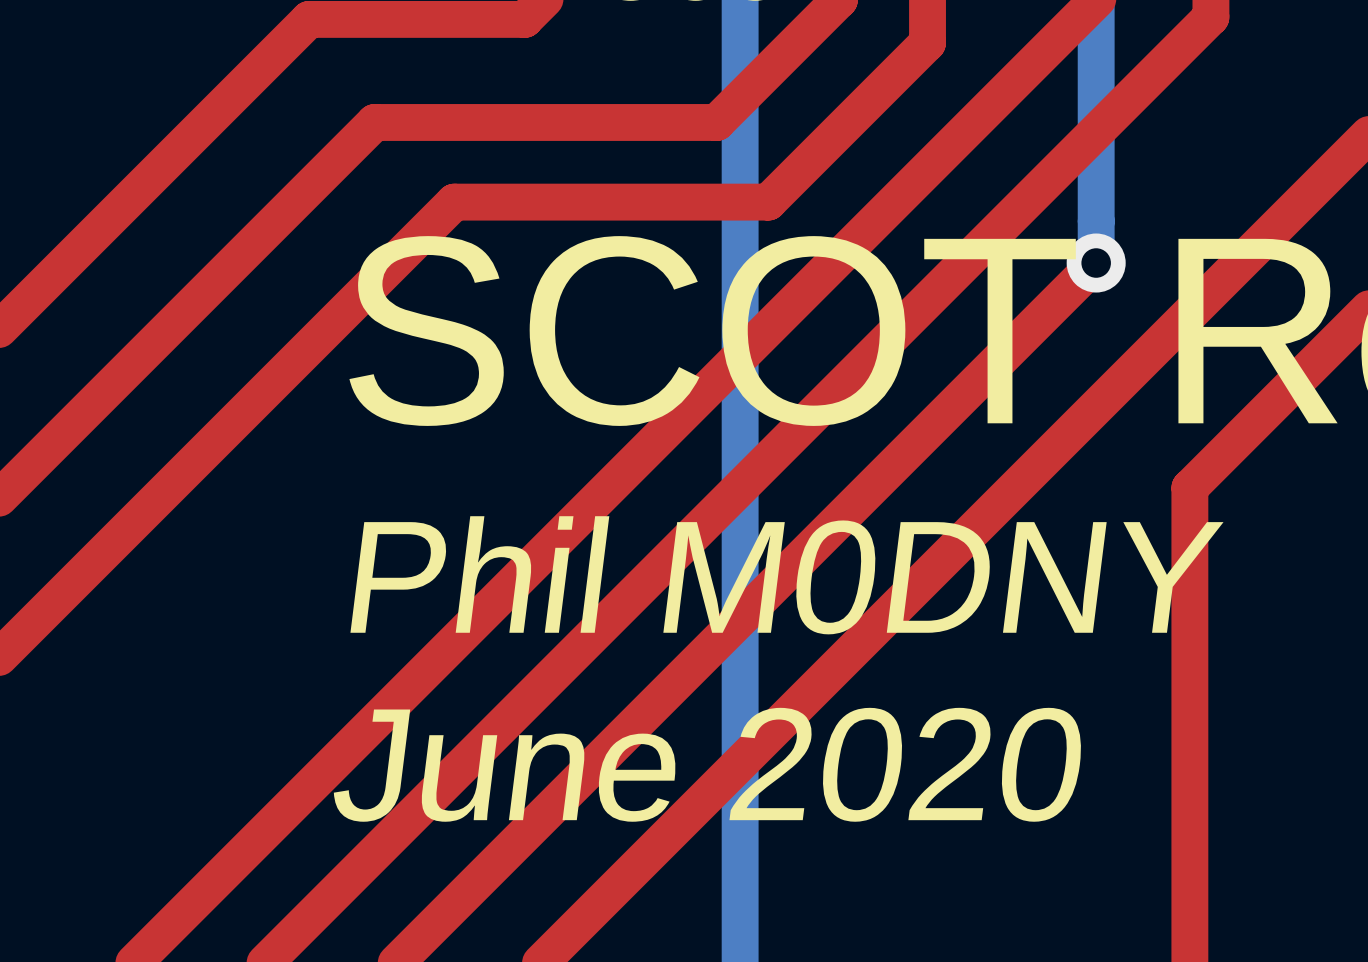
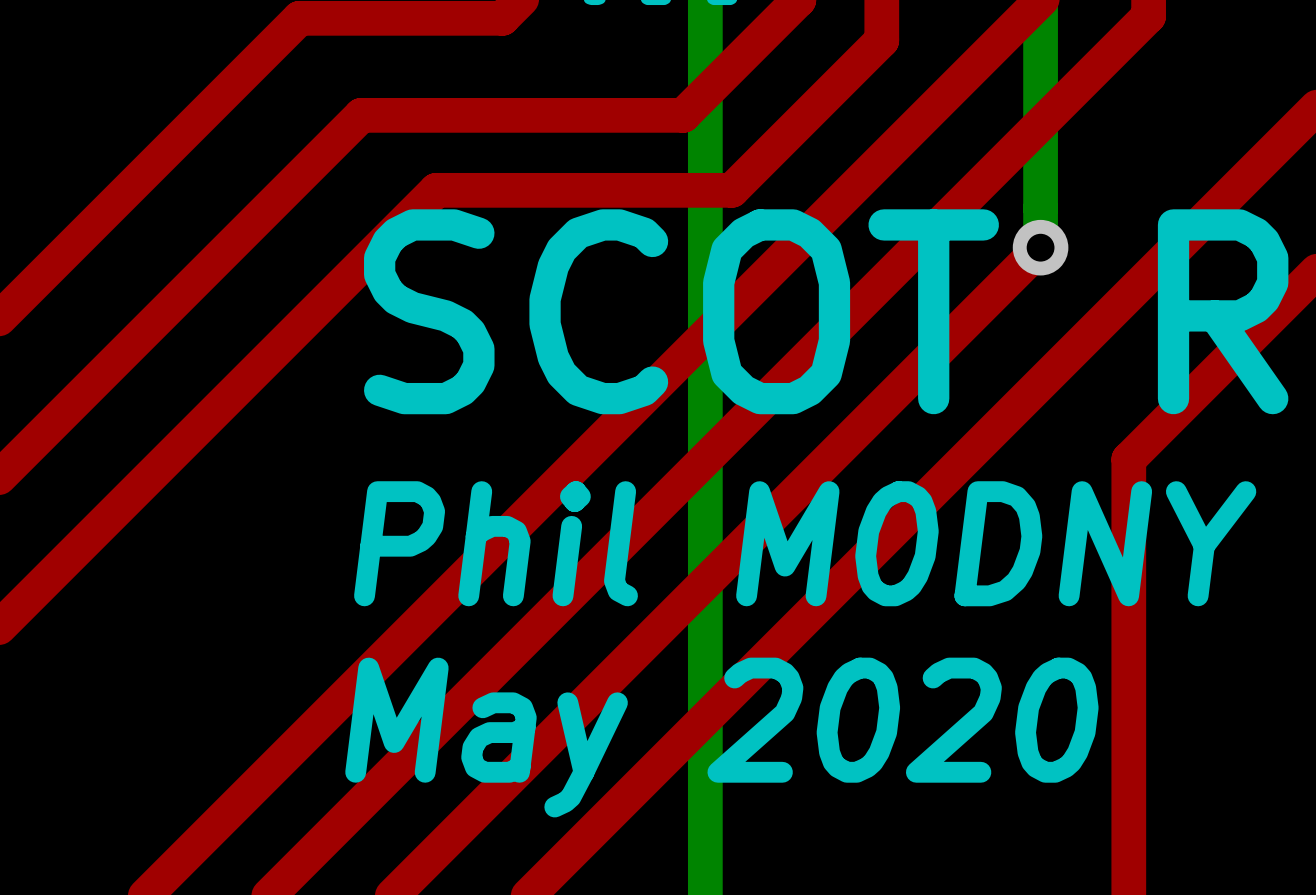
text: June 2020 (708, 764) -> May 2020 (721, 737)

